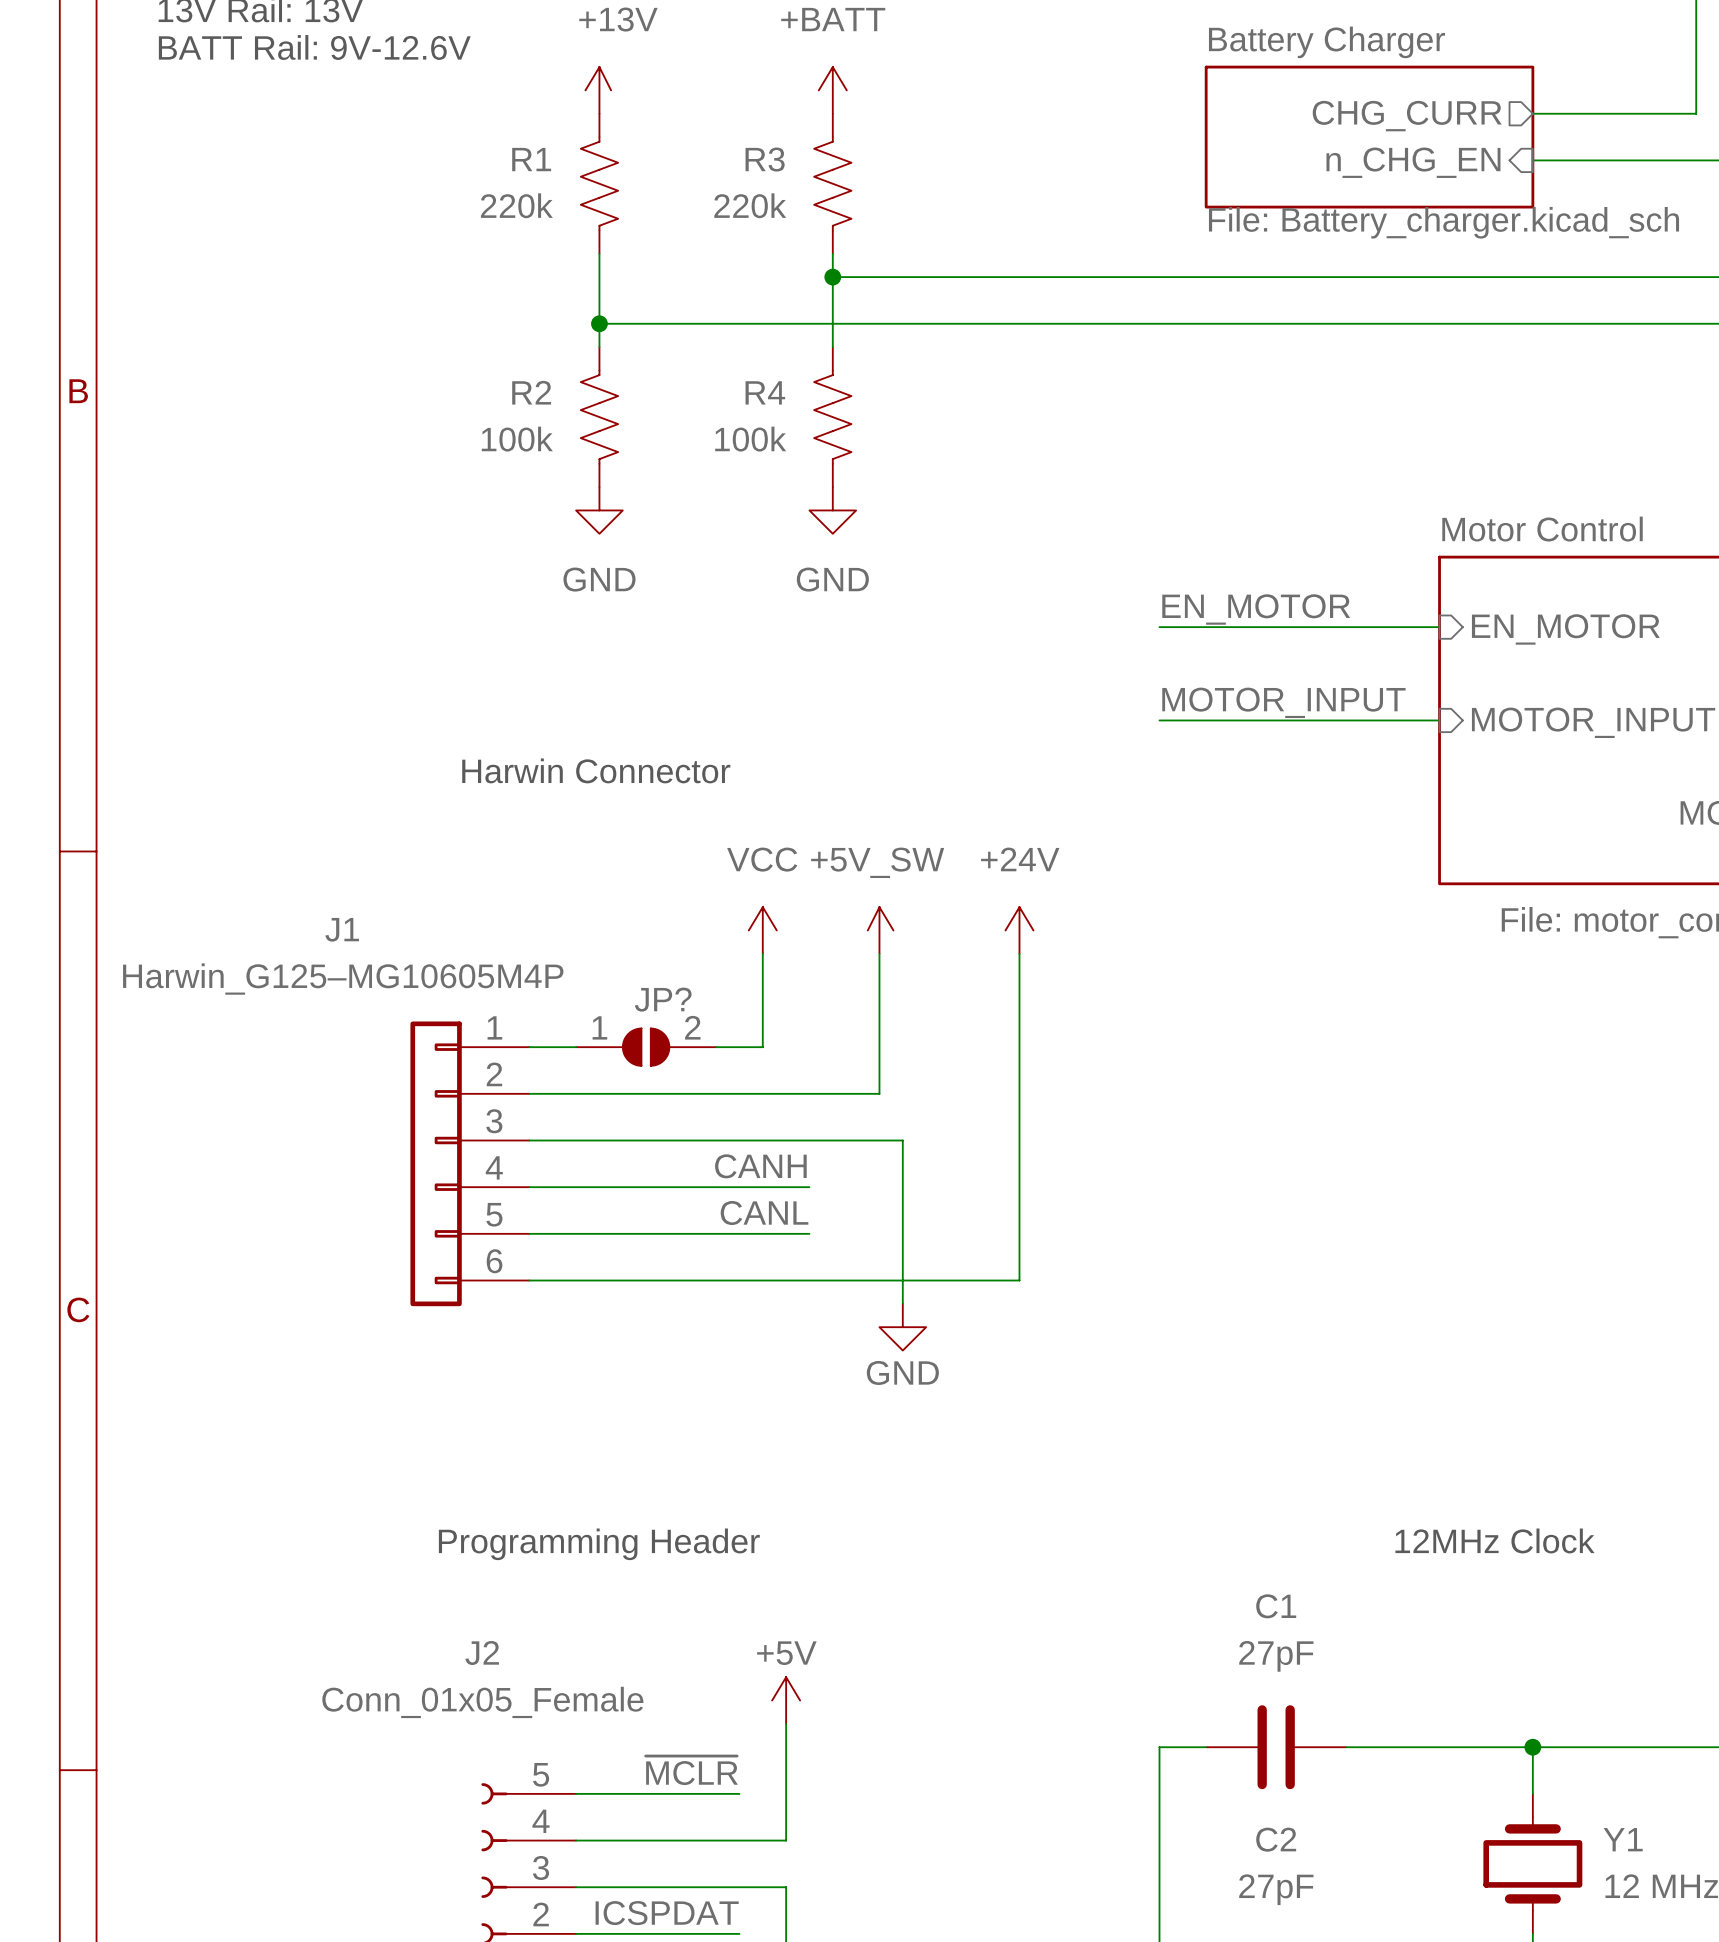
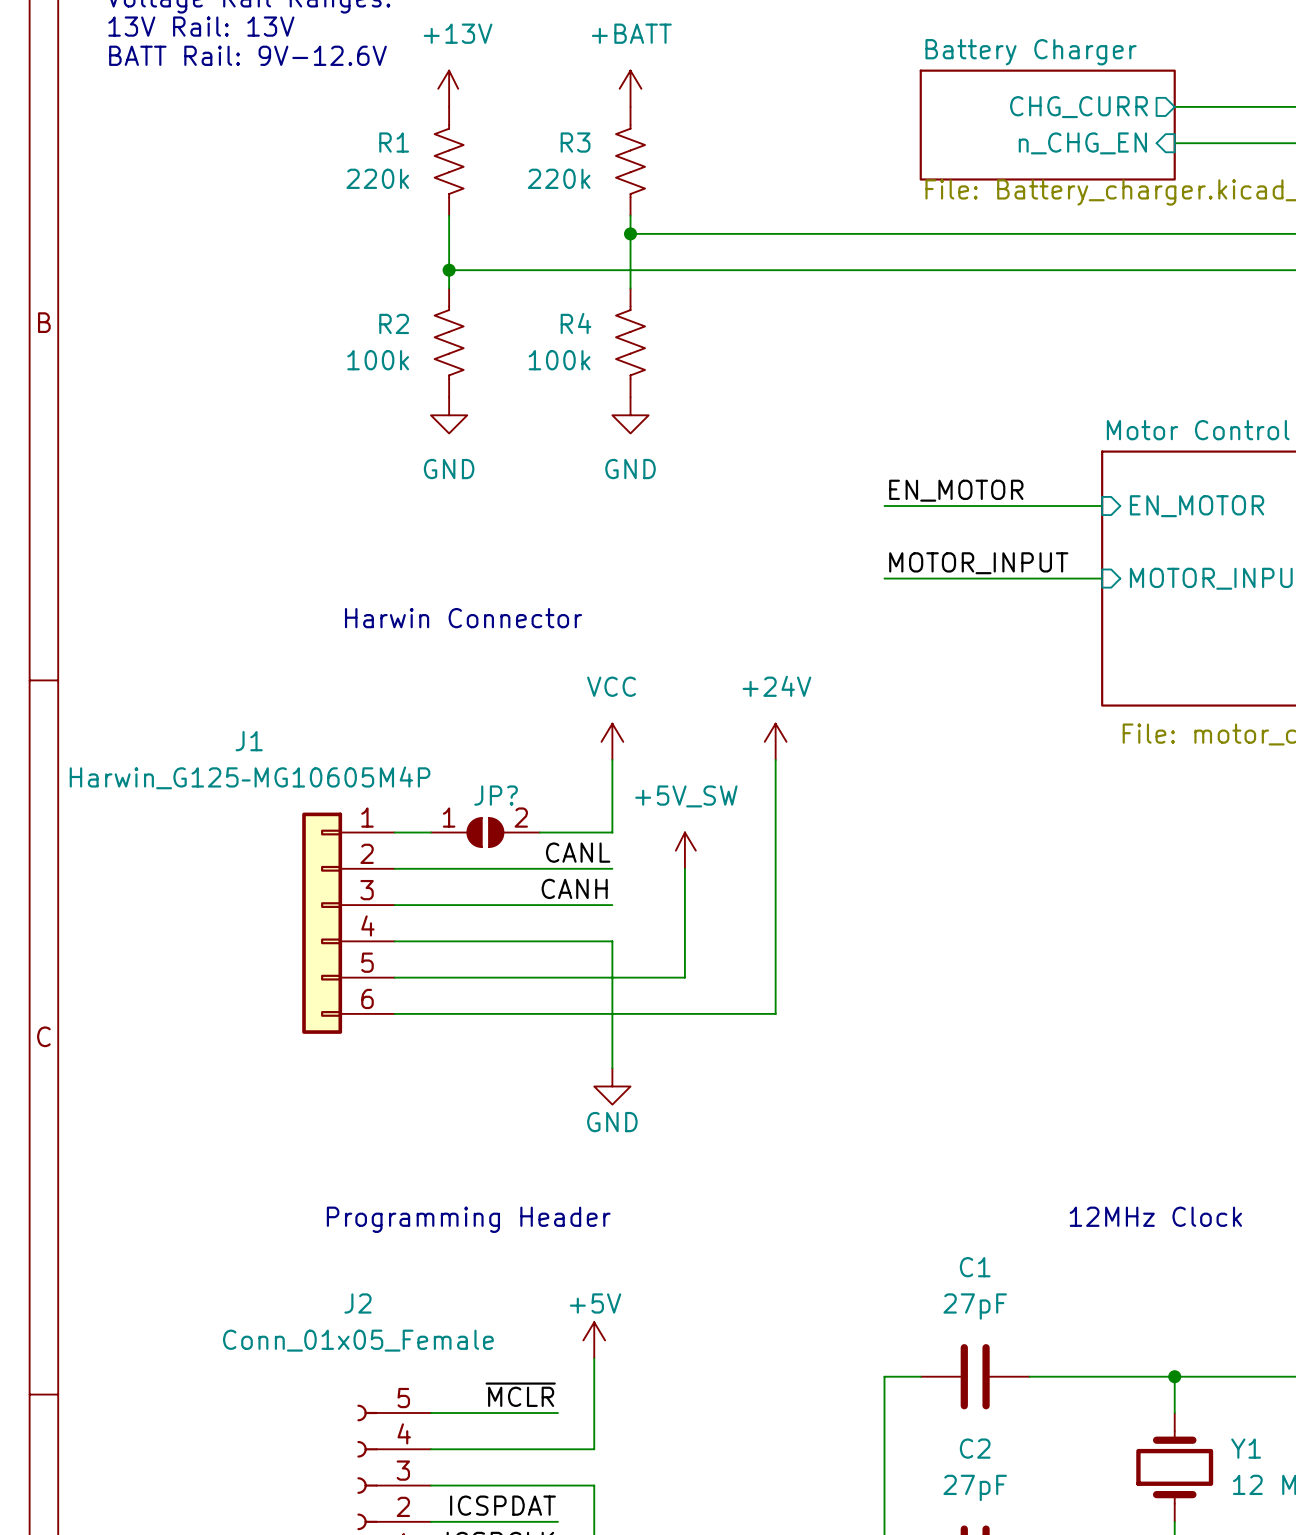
power symbol position: VCC (762, 930) -> VCC (612, 741)
power symbol position: +5V_SW (880, 930) -> +5V_SW (685, 850)
wire: (762, 953) (762, 1047) -> (612, 759) (612, 832) (576, 832)
wire: (879, 953) (879, 1093) (809, 1093) -> none
wire: (809, 1140) (902, 1140) -> (684, 868) (684, 905)
label position: CANH (760, 1166) -> CANH (574, 888)
wire: none -> (612, 941) (612, 1068)
label position: CANL (764, 1213) -> CANL (578, 852)
wire: (902, 1233) (902, 1303) -> (684, 977) (612, 977)
power symbol position: GND (902, 1327) -> GND (612, 1086)

